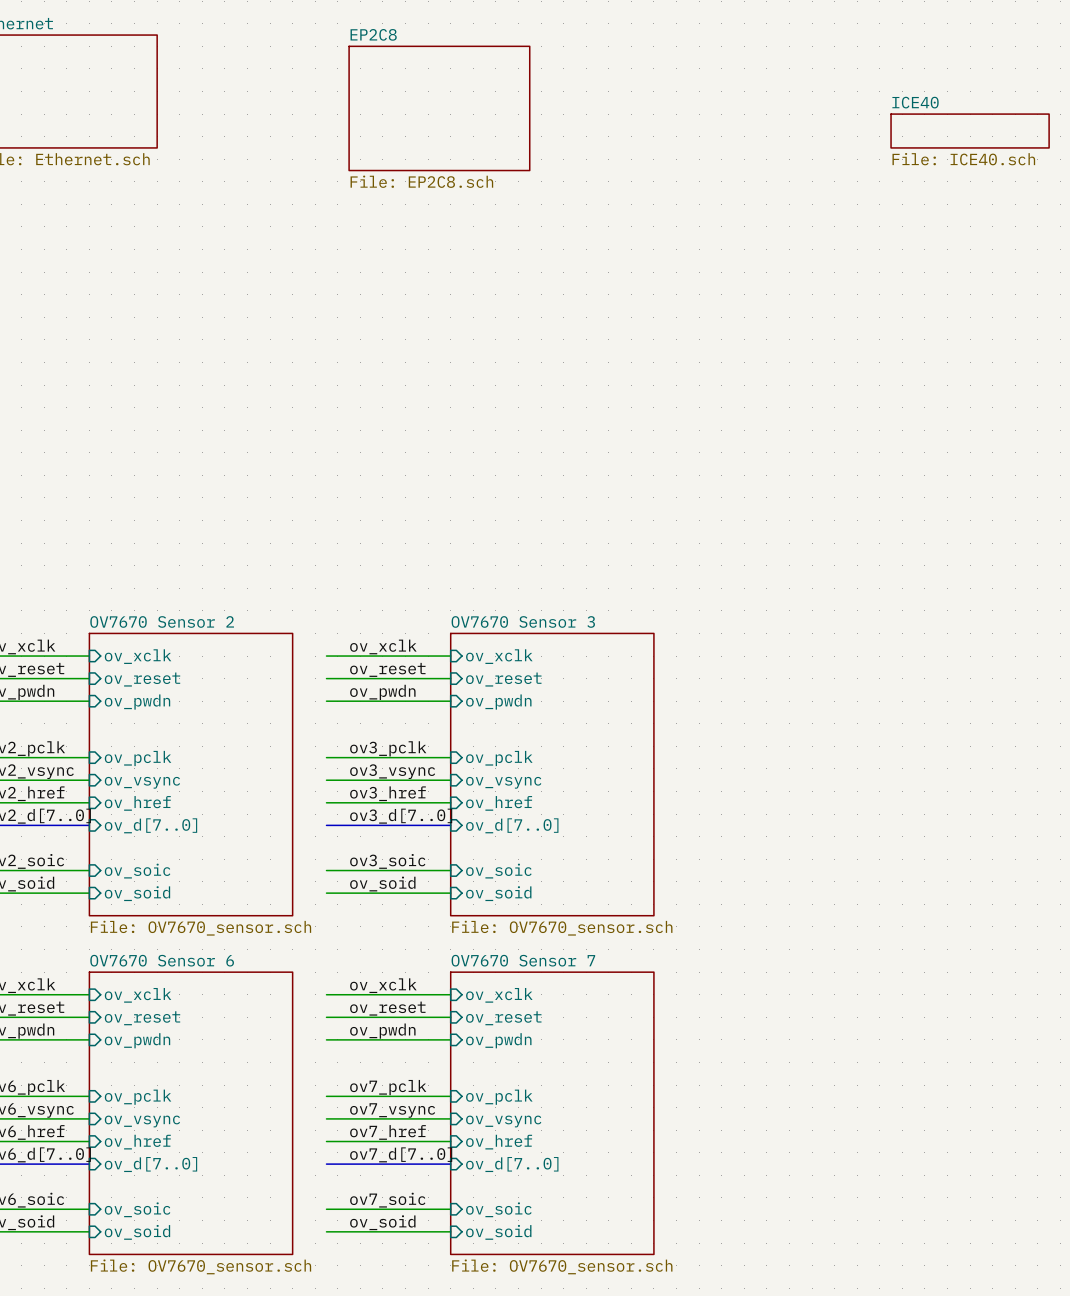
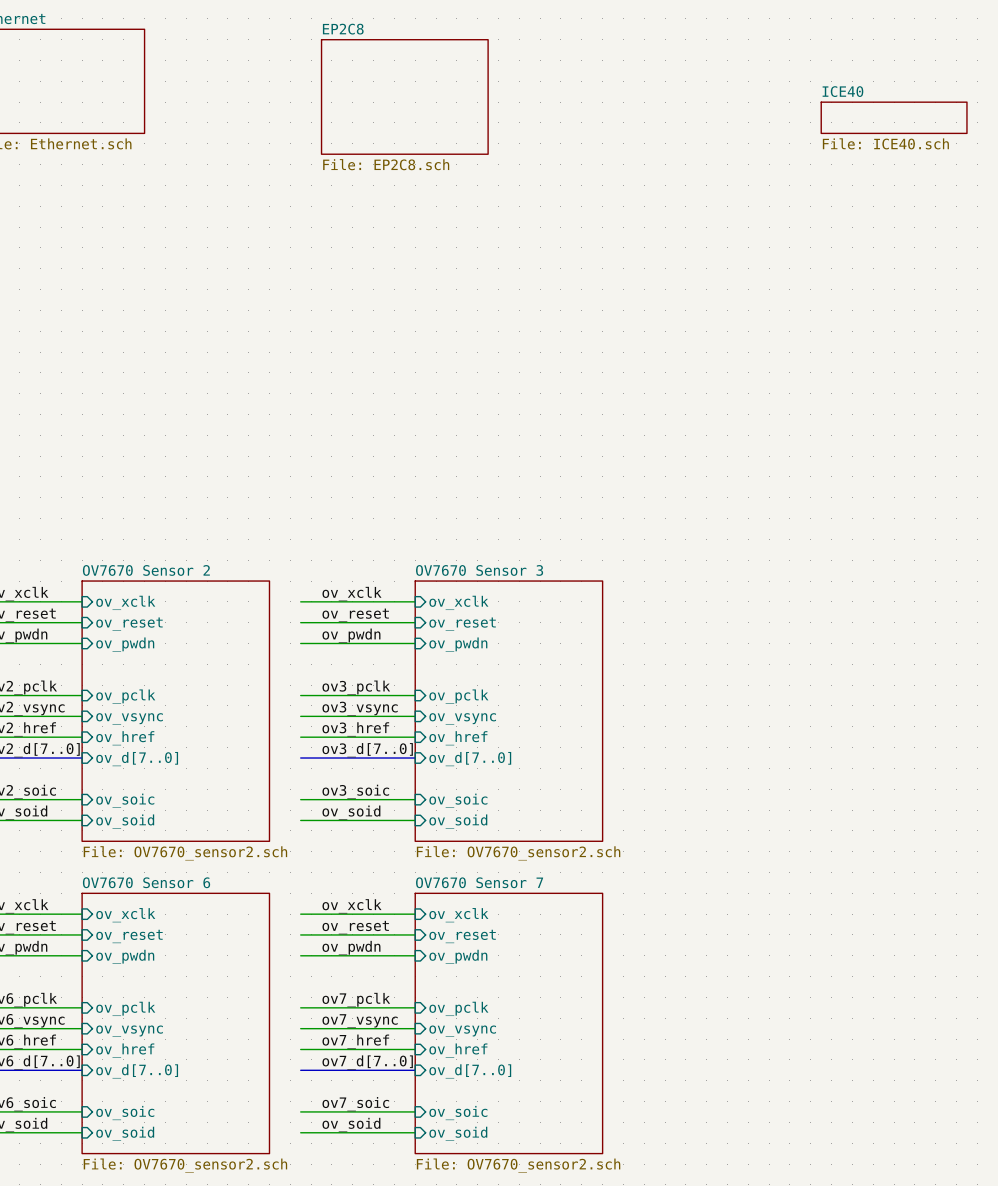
sheet OV7670 Sensor 2 value: File: OV7670_sensor.sch (201, 928) -> File: OV7670_sensor2.sch (185, 853)
sheet OV7670 Sensor 3 value: File: OV7670_sensor.sch (562, 928) -> File: OV7670_sensor2.sch (518, 853)
sheet OV7670 Sensor 6 value: File: OV7670_sensor.sch (201, 1266) -> File: OV7670_sensor2.sch (185, 1165)
sheet OV7670 Sensor 7 value: File: OV7670_sensor.sch (562, 1266) -> File: OV7670_sensor2.sch (518, 1165)

